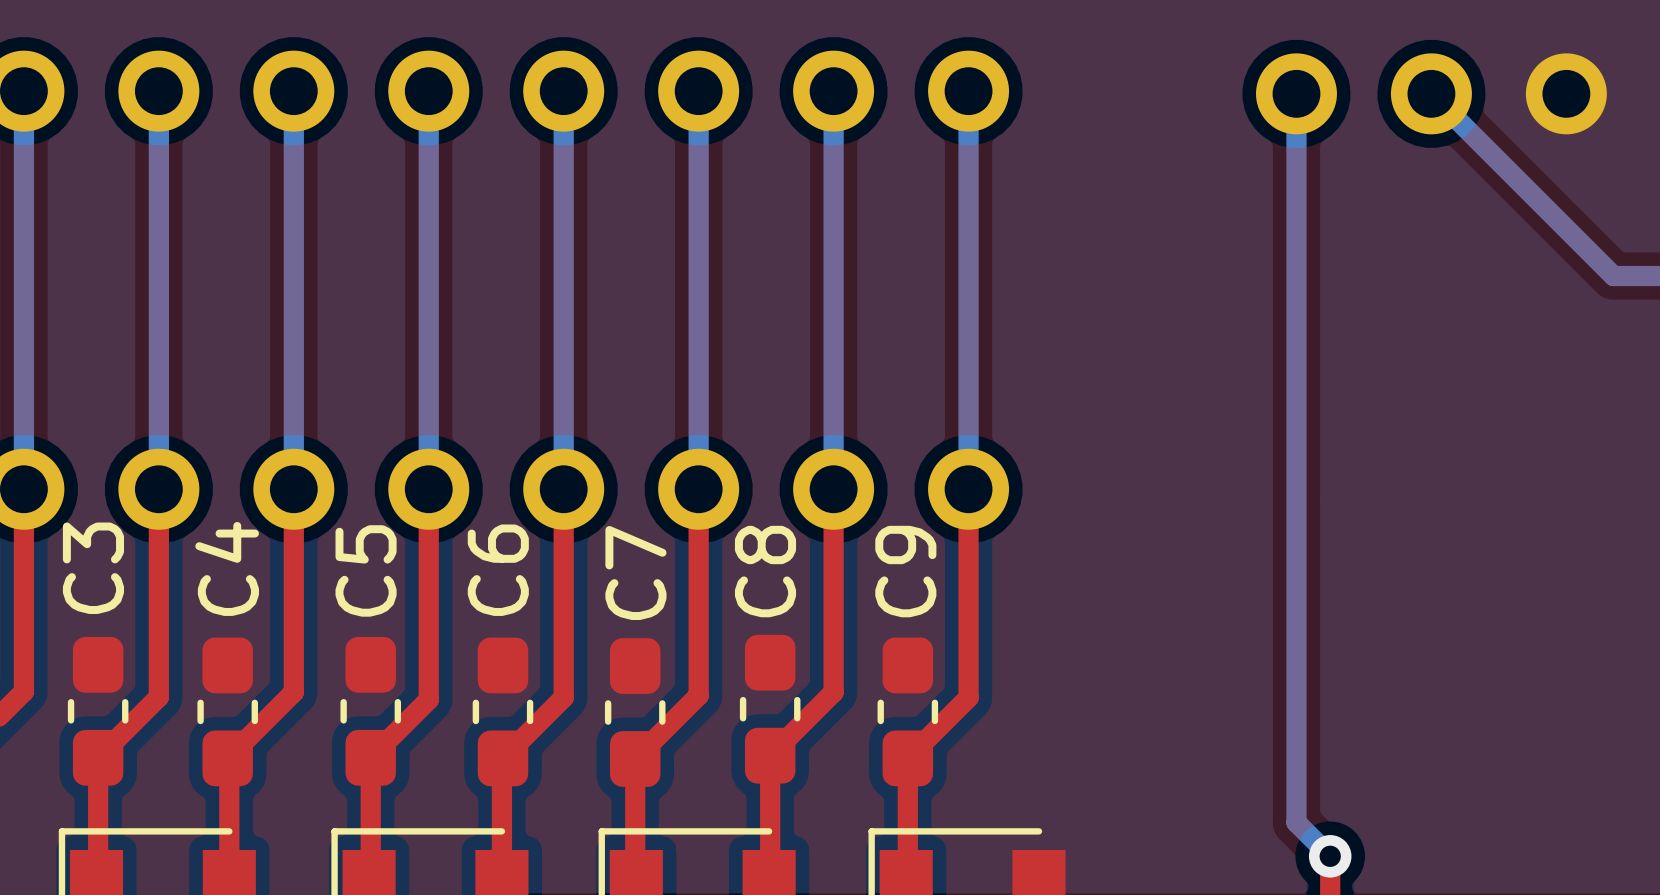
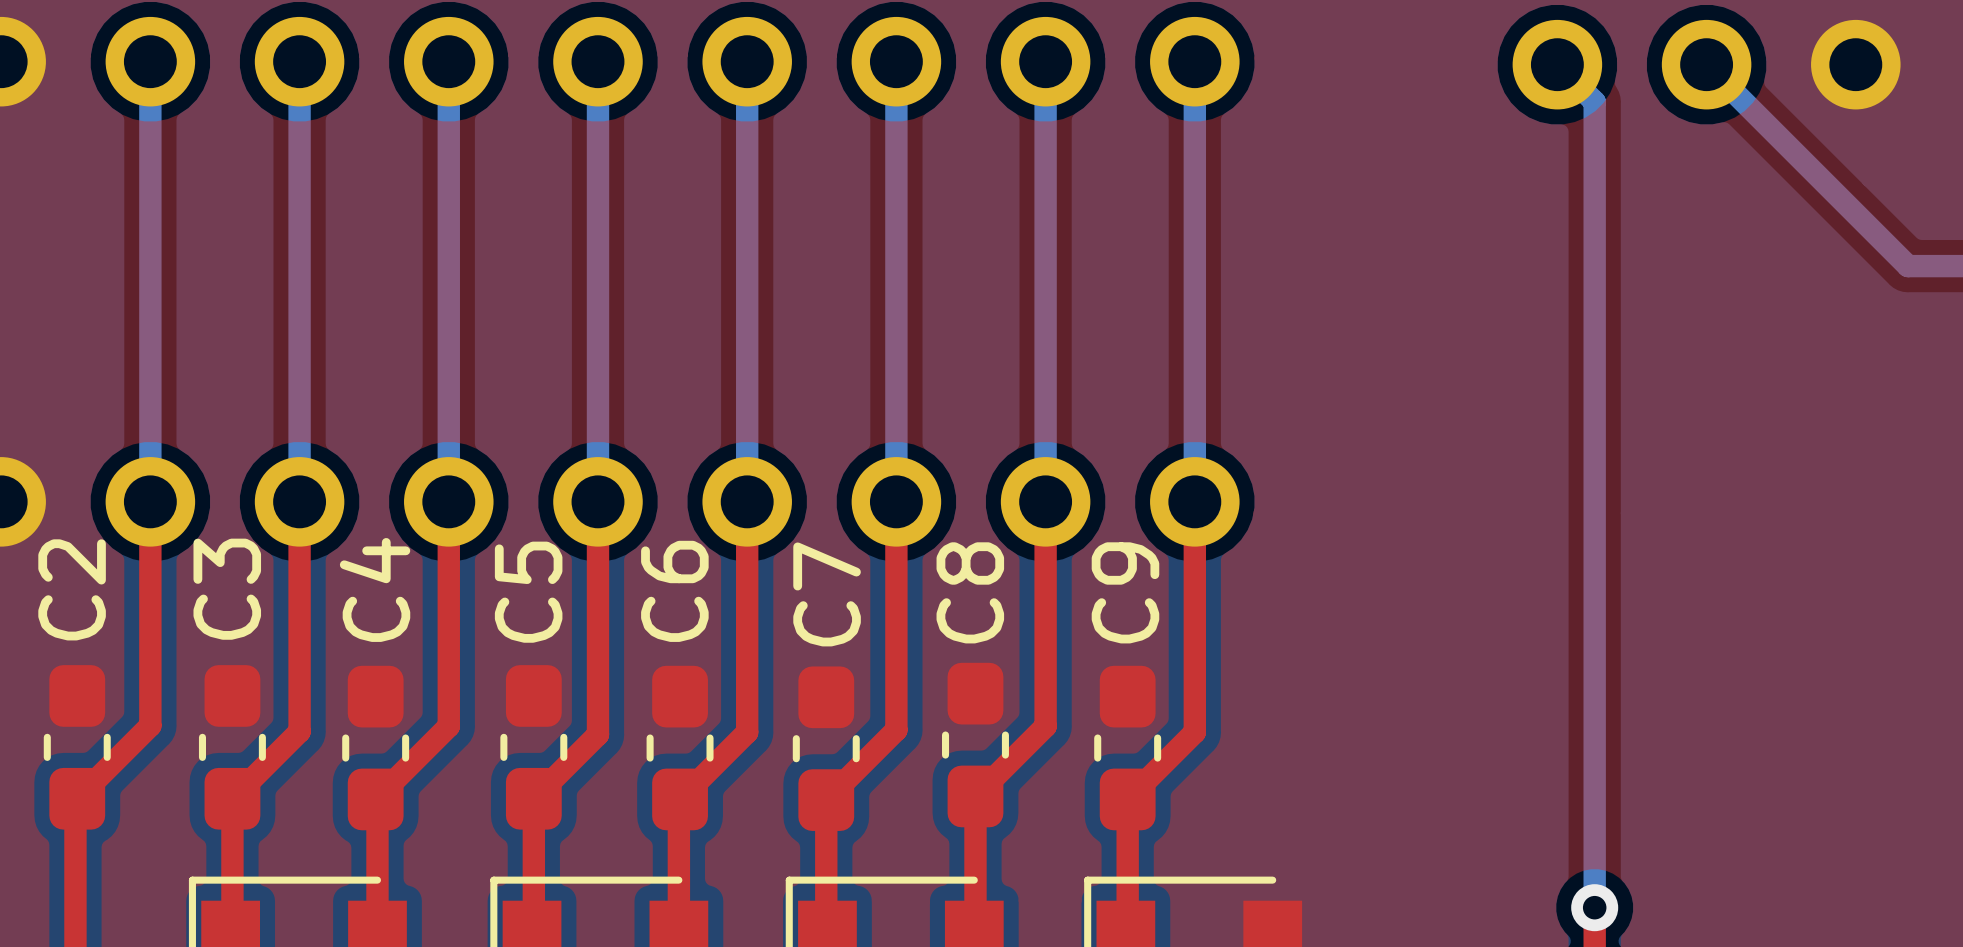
bottom track: (1296, 93) (1296, 822) (1330, 856) -> (1557, 64) (1594, 101) (1594, 907)

